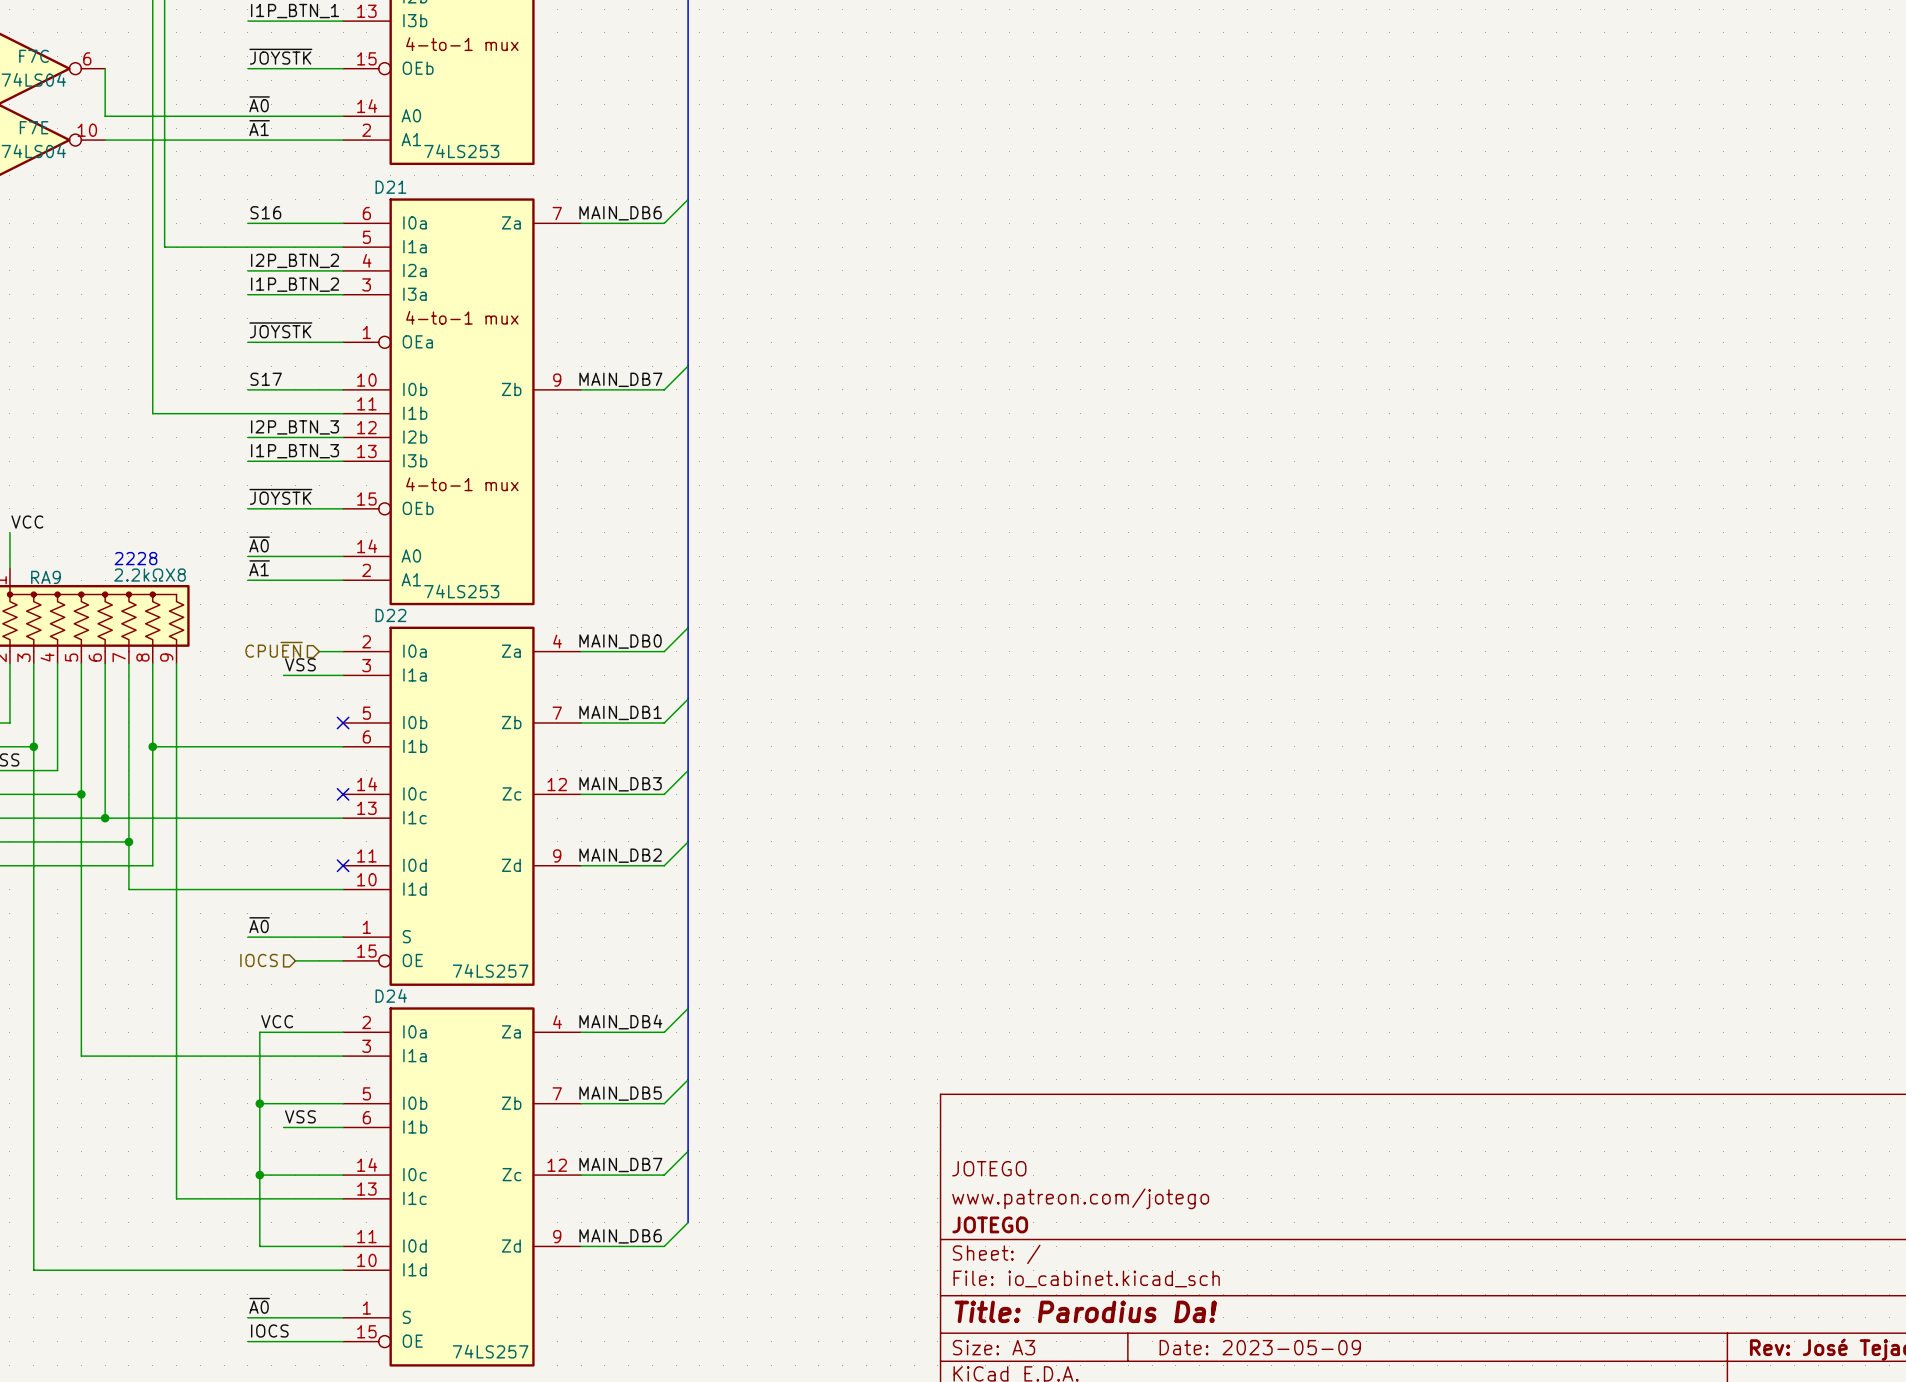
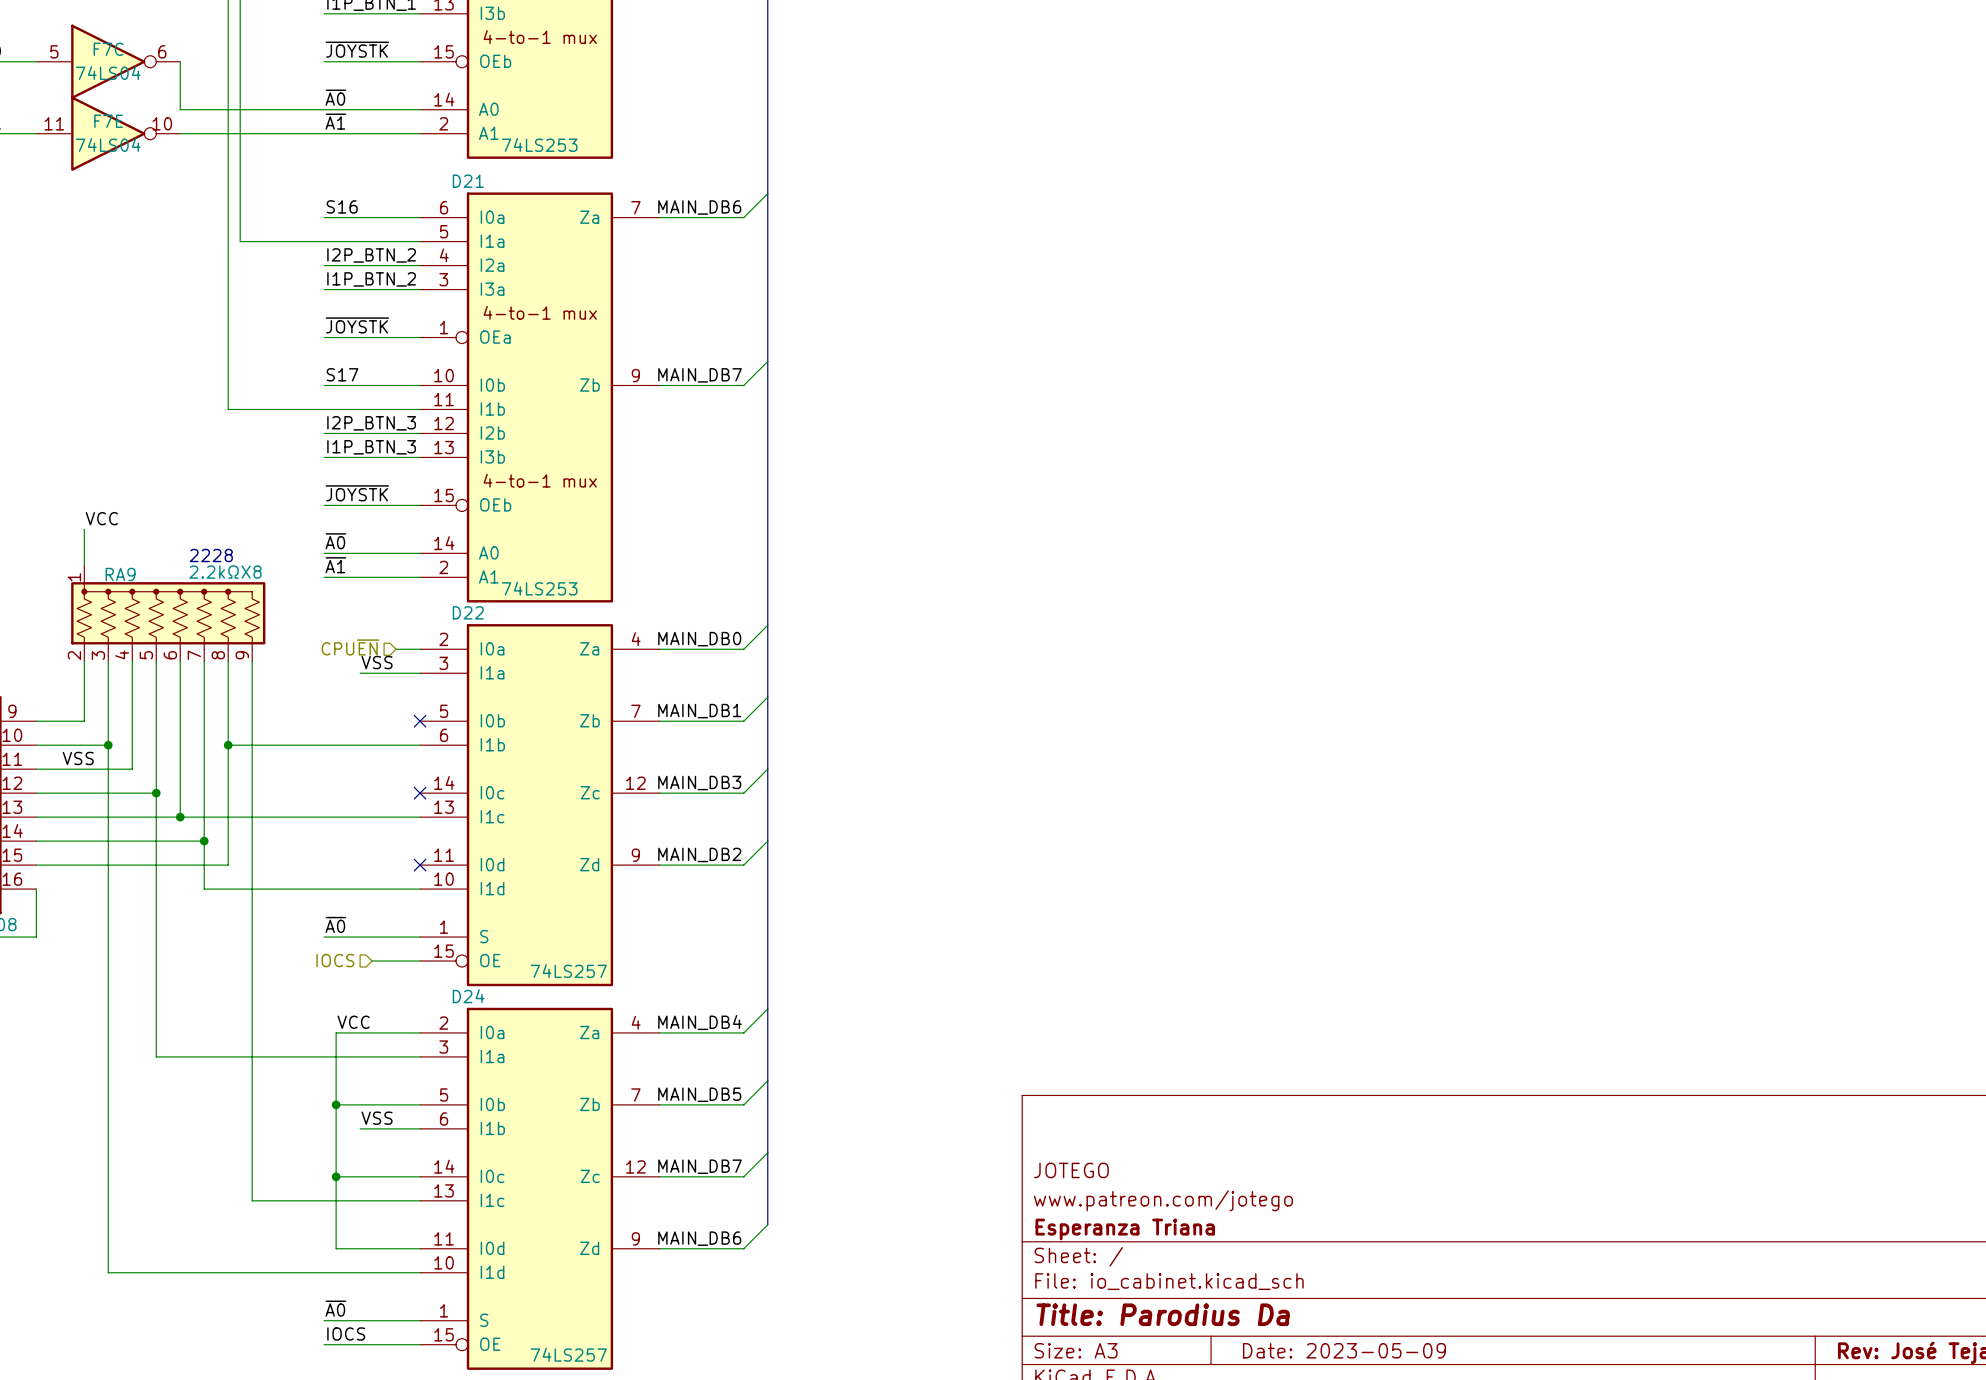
title block: JOTEGO (990, 1224) -> Esperanza Triana (1125, 1229)
title block: Title: Parodius Da! (1085, 1311) -> Title: Parodius Da (1163, 1314)

